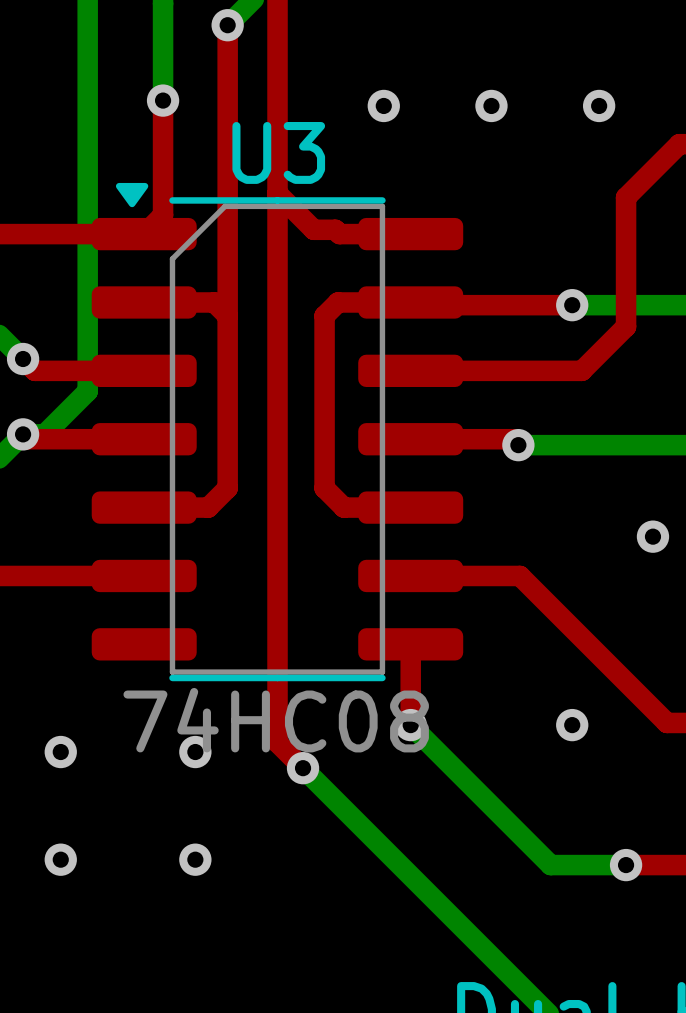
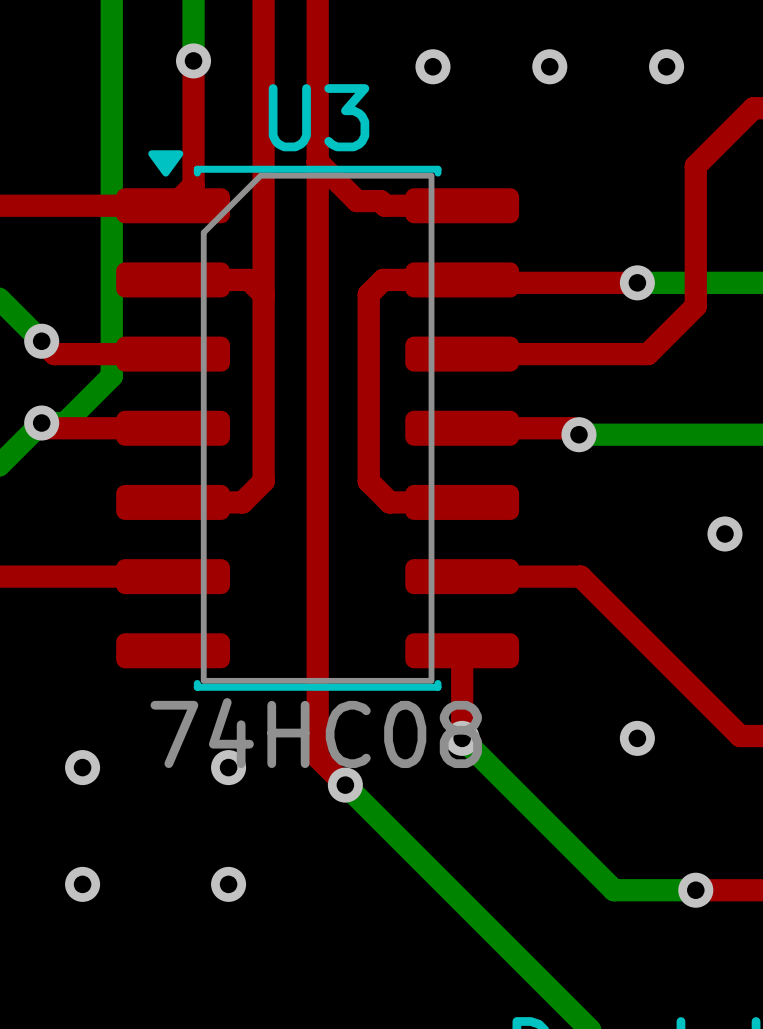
U3 footprint: [91, 182, 464, 682] -> [116, 150, 520, 691]

